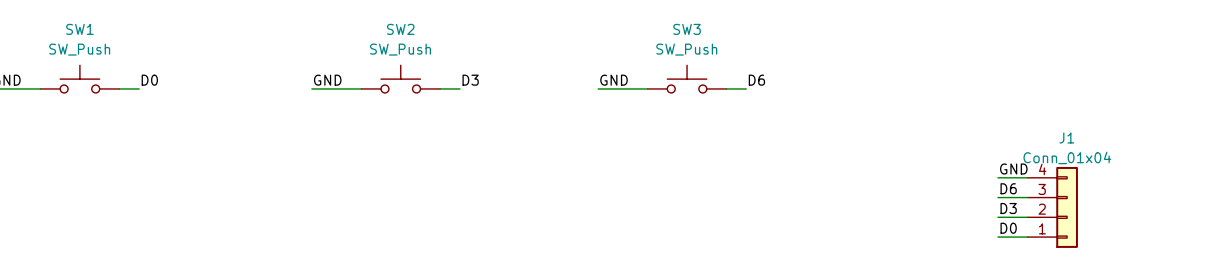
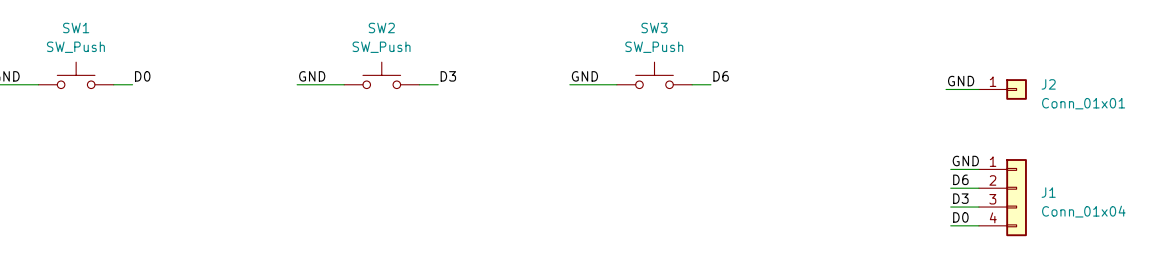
label: none -> GND (961, 81)
wire: none -> (946, 89) (978, 89)
J2: none -> Conn_01x01 (1002, 89)
J1 name position: J1 (1066, 137) -> J1 (1048, 192)
J1 value position: Conn_01x04 (1067, 157) -> Conn_01x04 (1083, 211)
J1 flip: as is (1067, 207) -> up-down (1016, 197)

